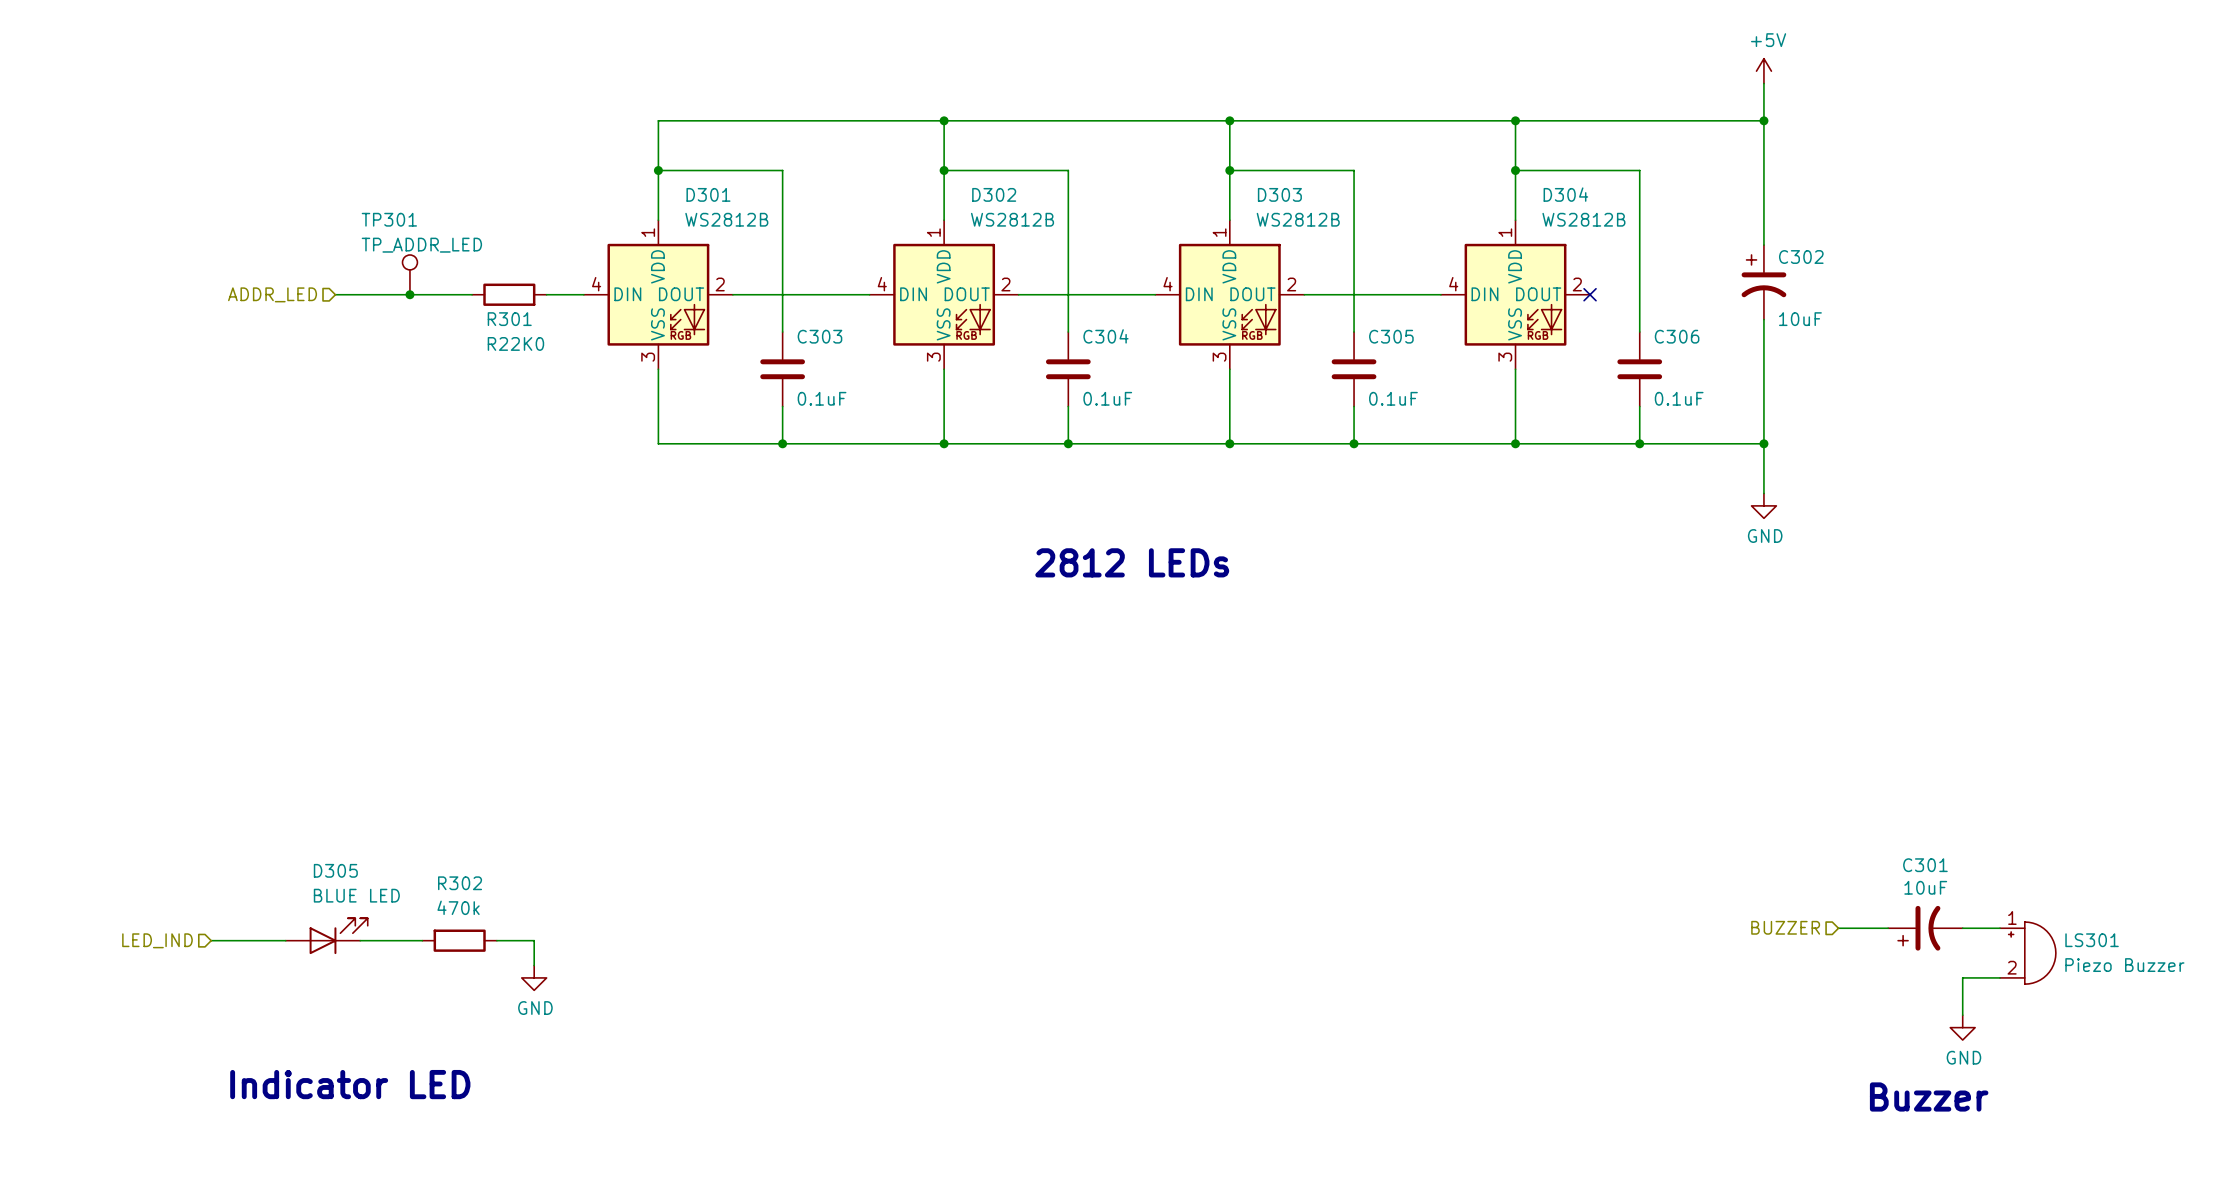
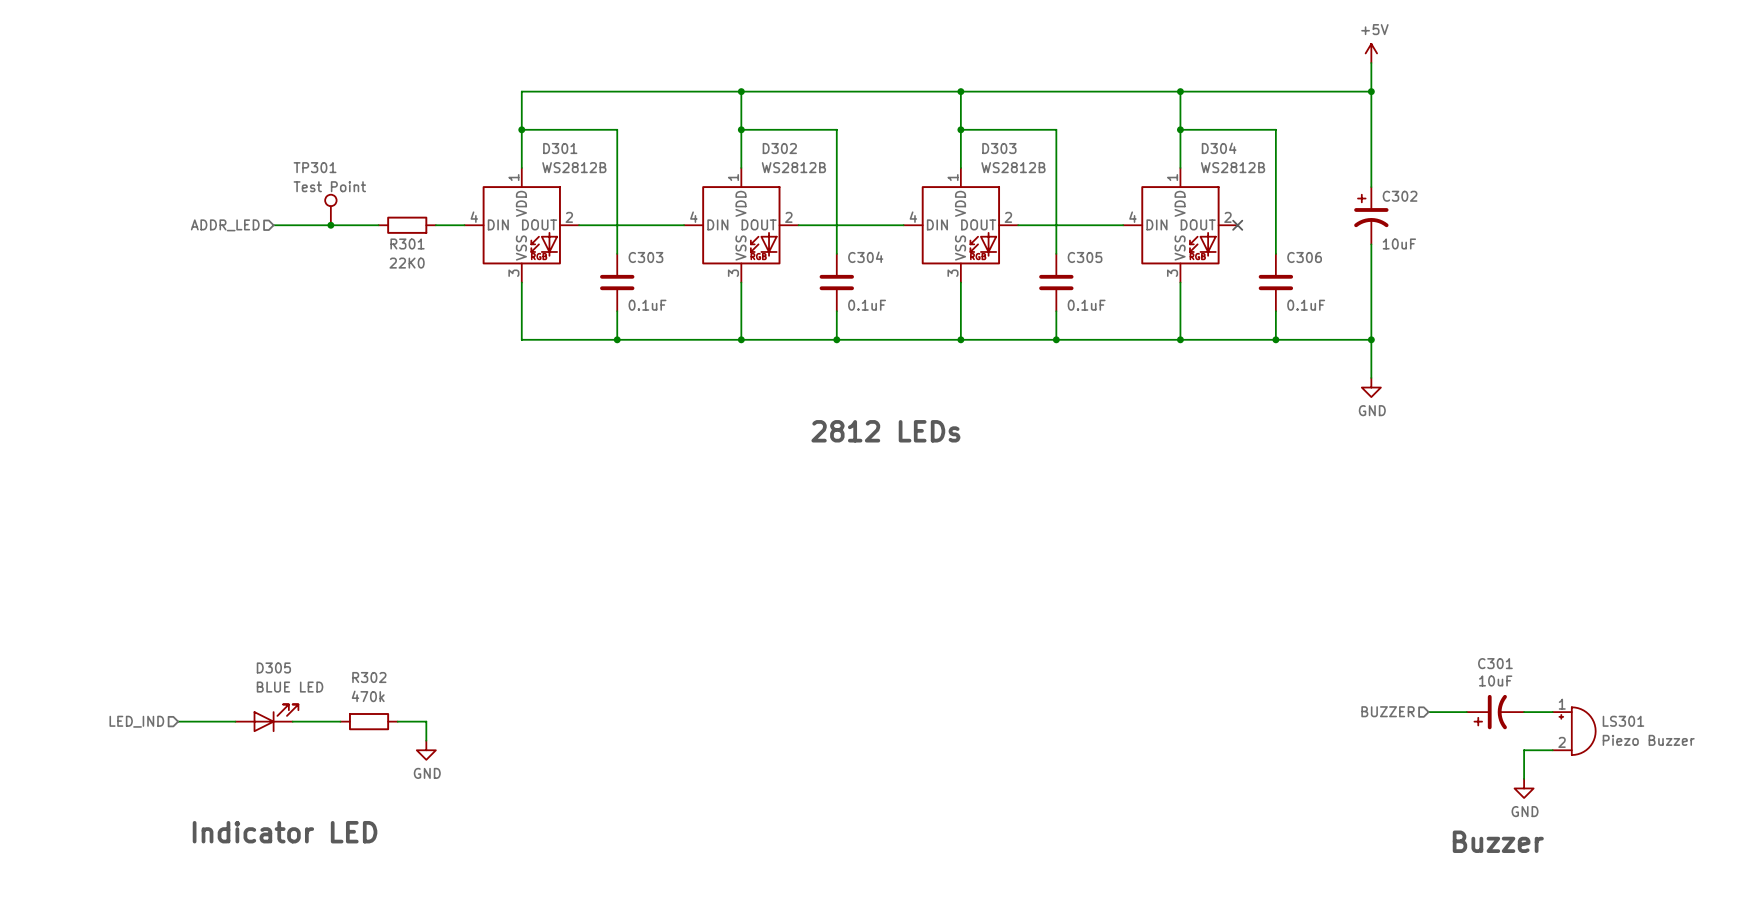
TP301 value: TP_ADDR_LED (421, 245) -> Test Point (329, 186)
R301 value: R22K0 (515, 343) -> 22K0 (407, 263)

